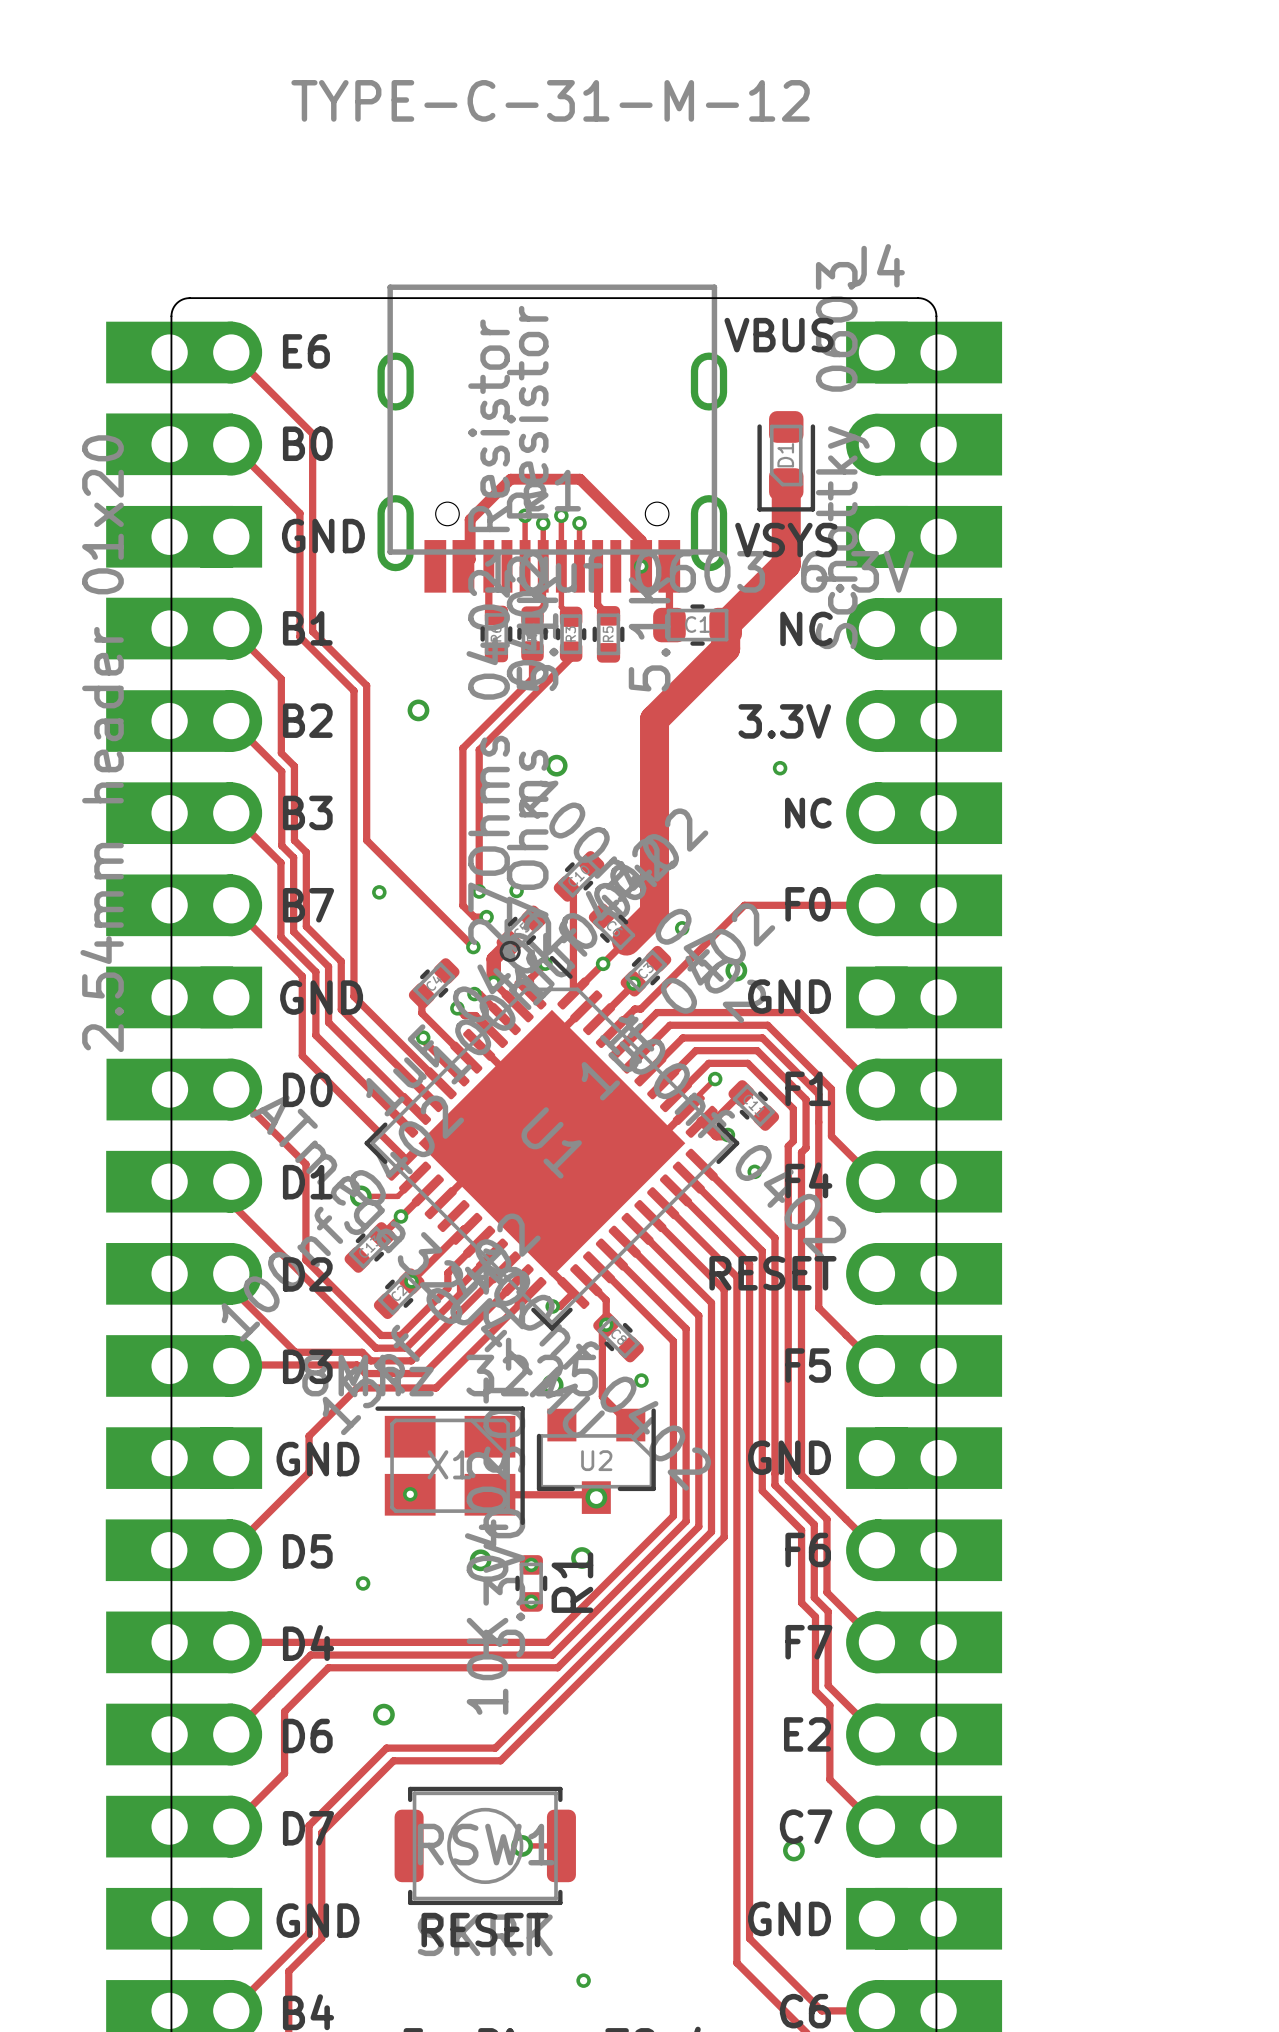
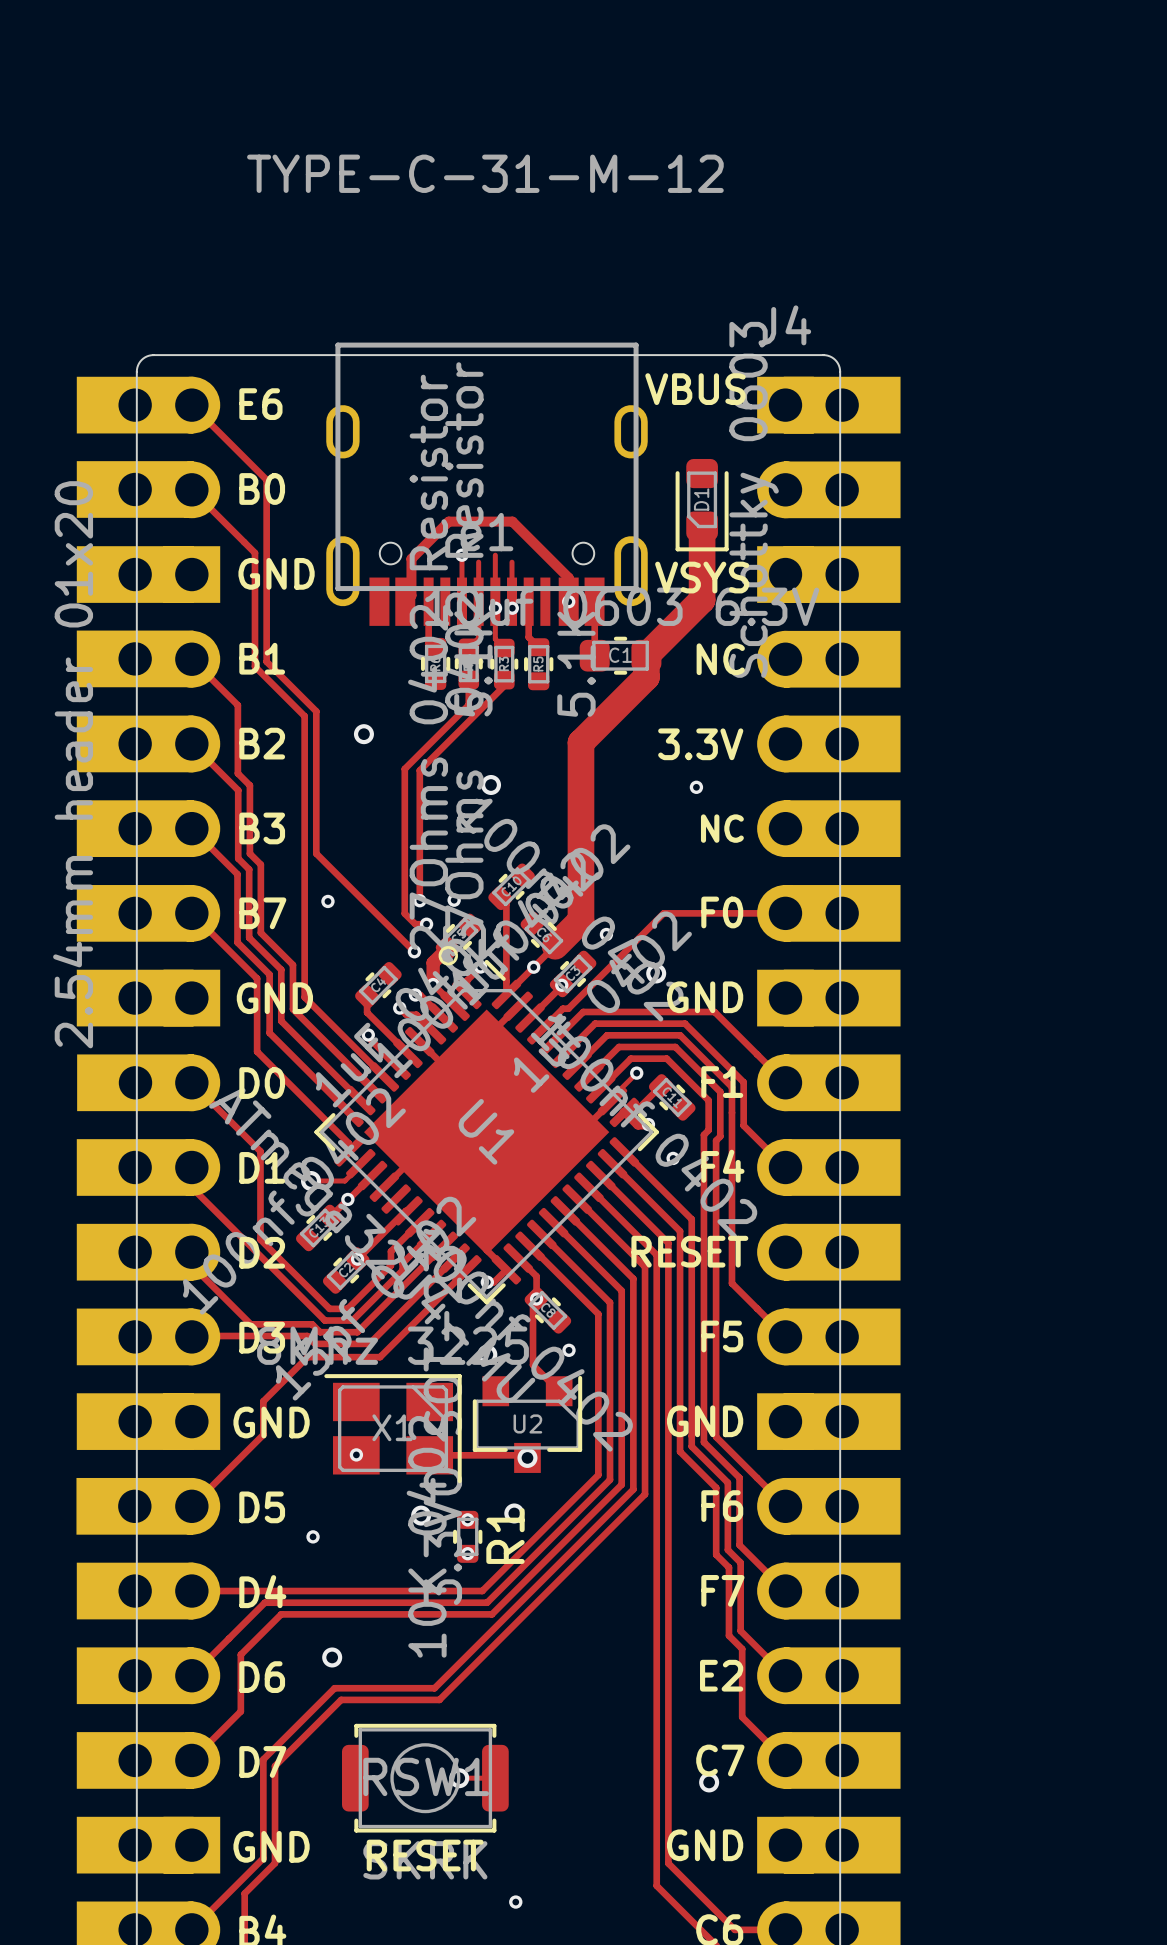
via: (561, 515) -> none
via: (543, 523) -> none
via: (579, 523) -> none
via: none -> (495, 608)
via: none -> (512, 608)

